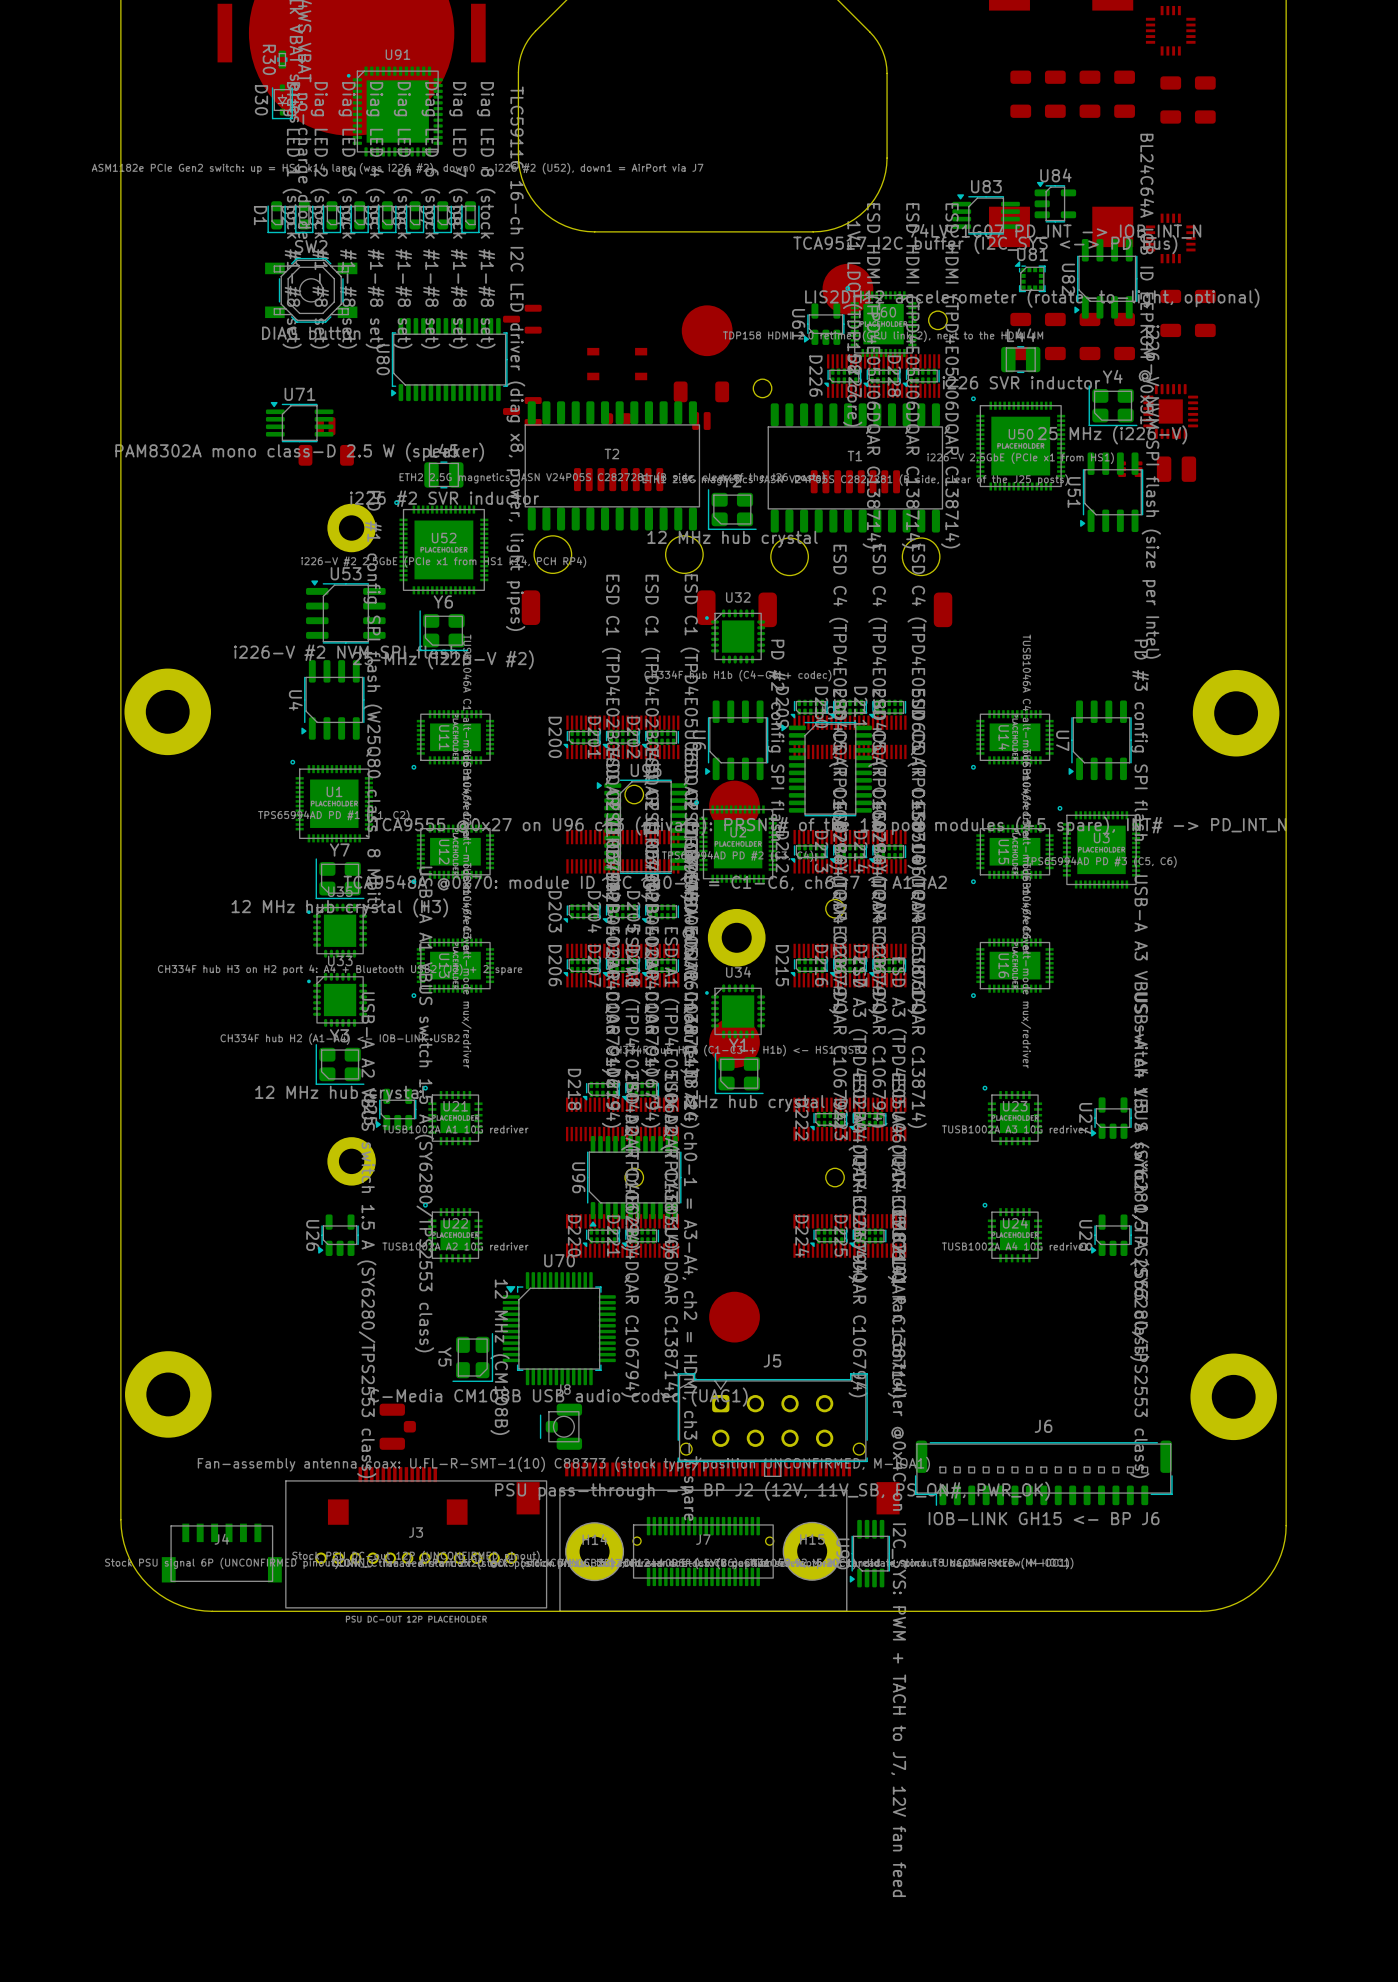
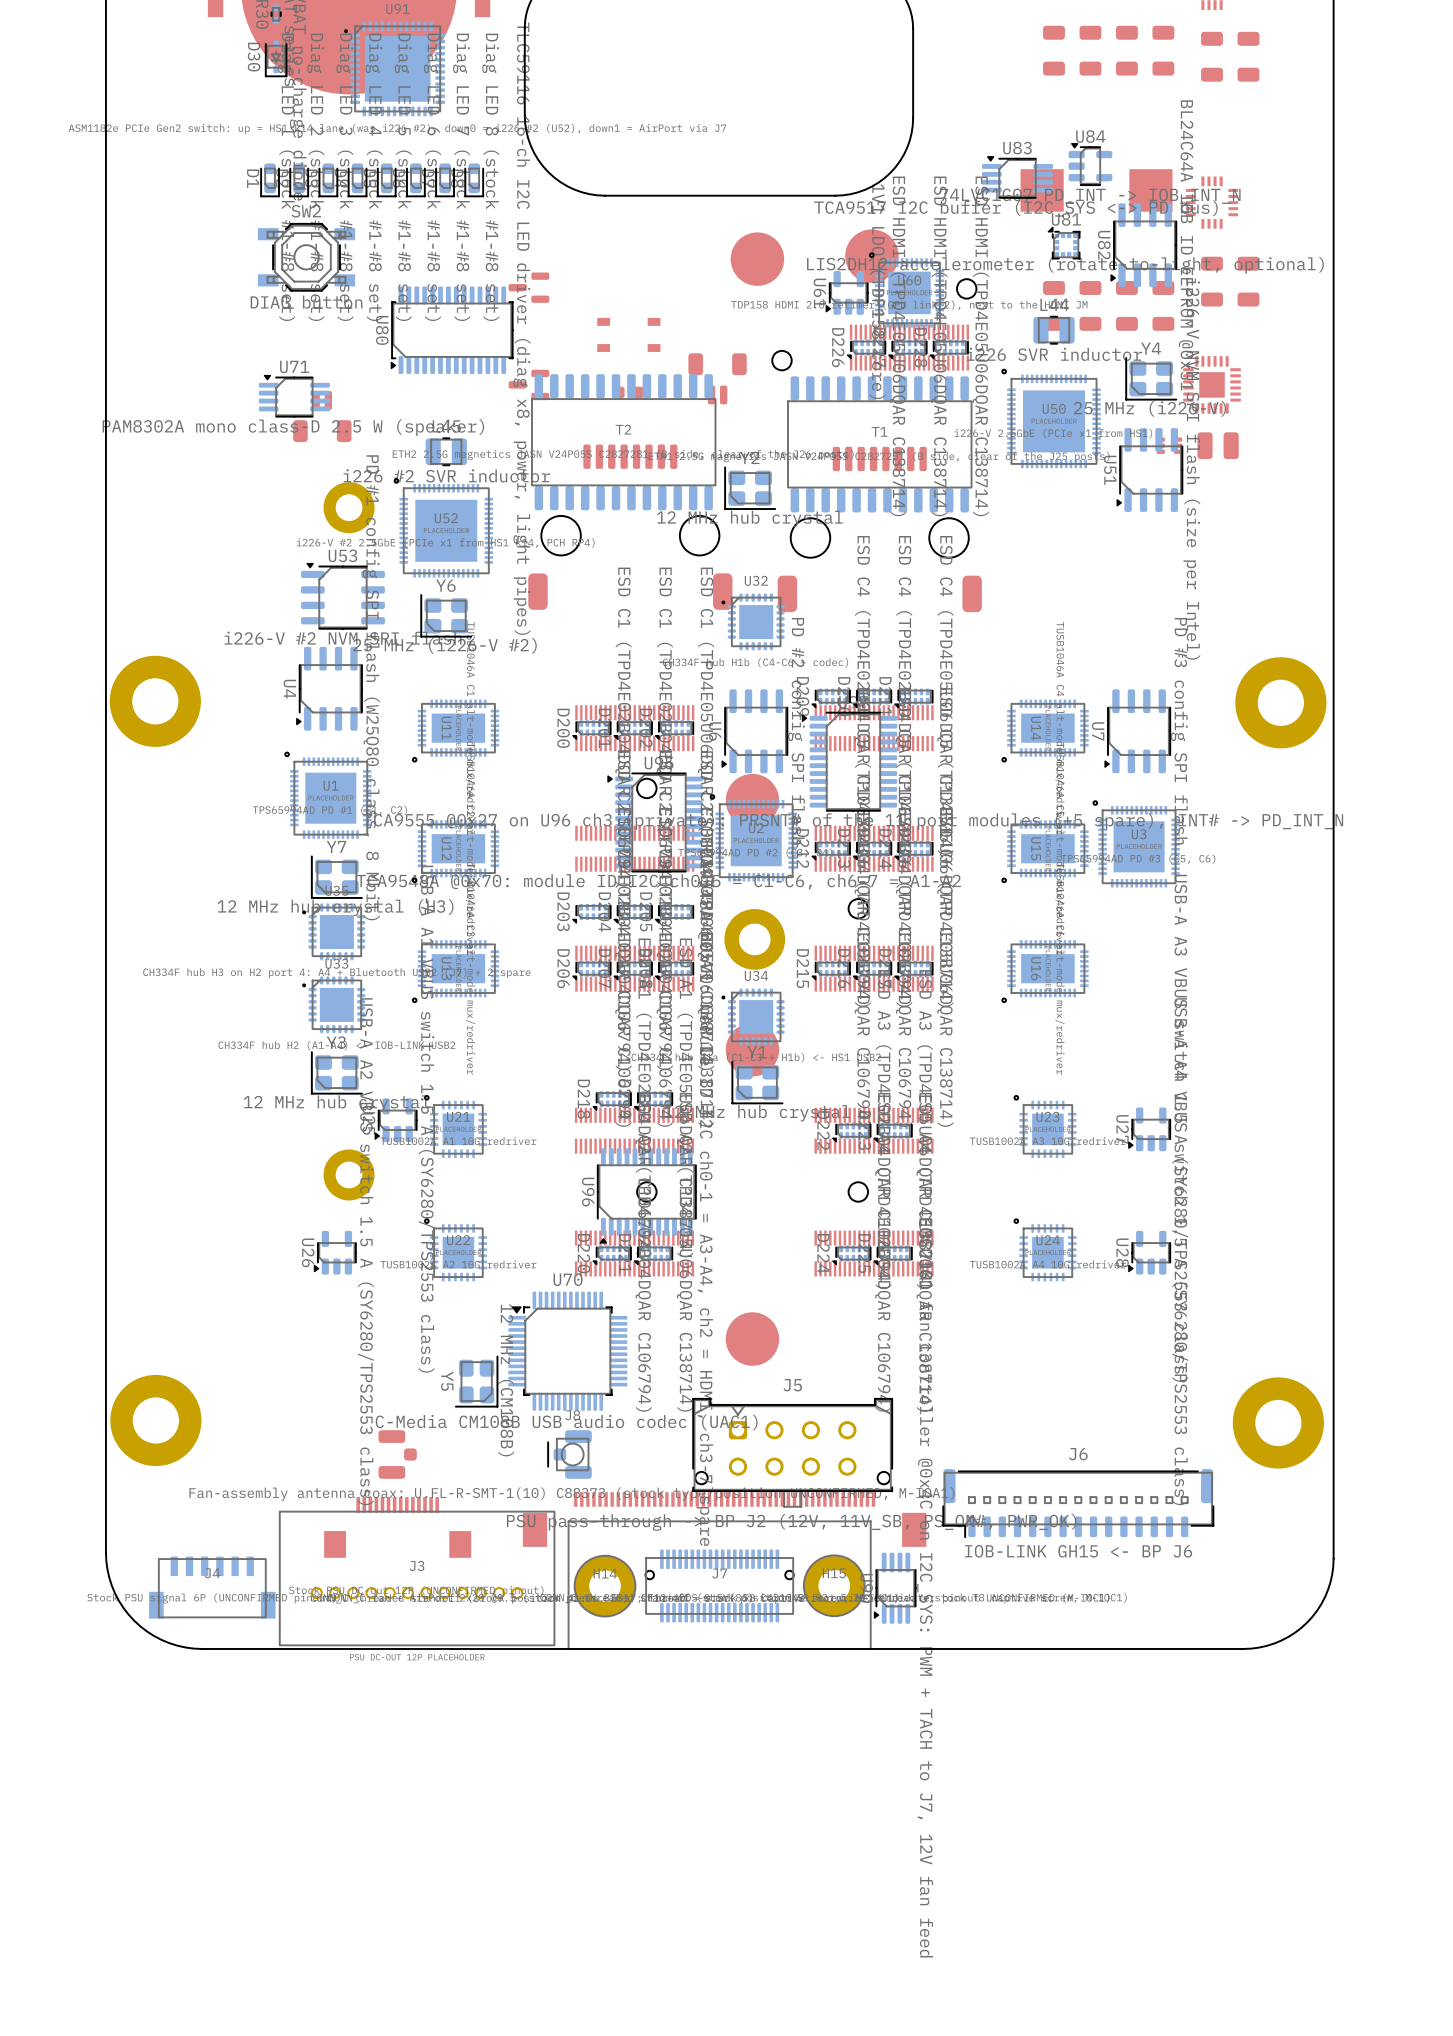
part position: (707, 330) -> (757, 259)

